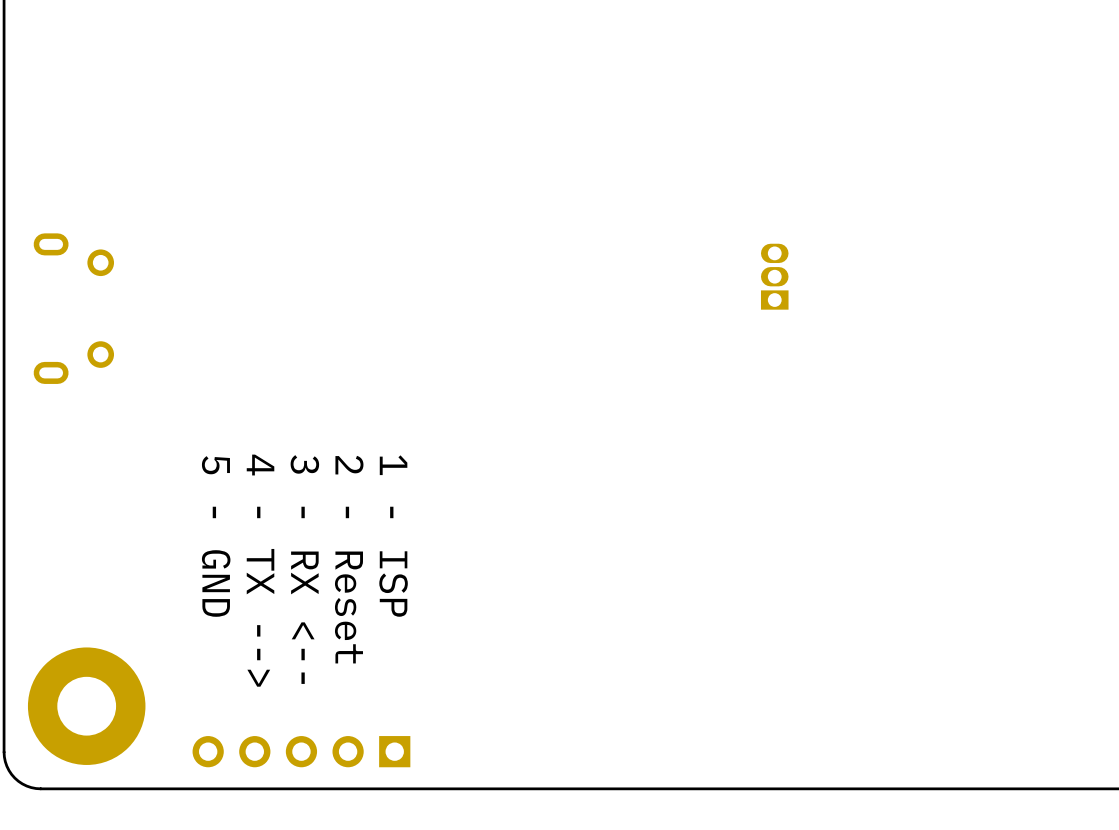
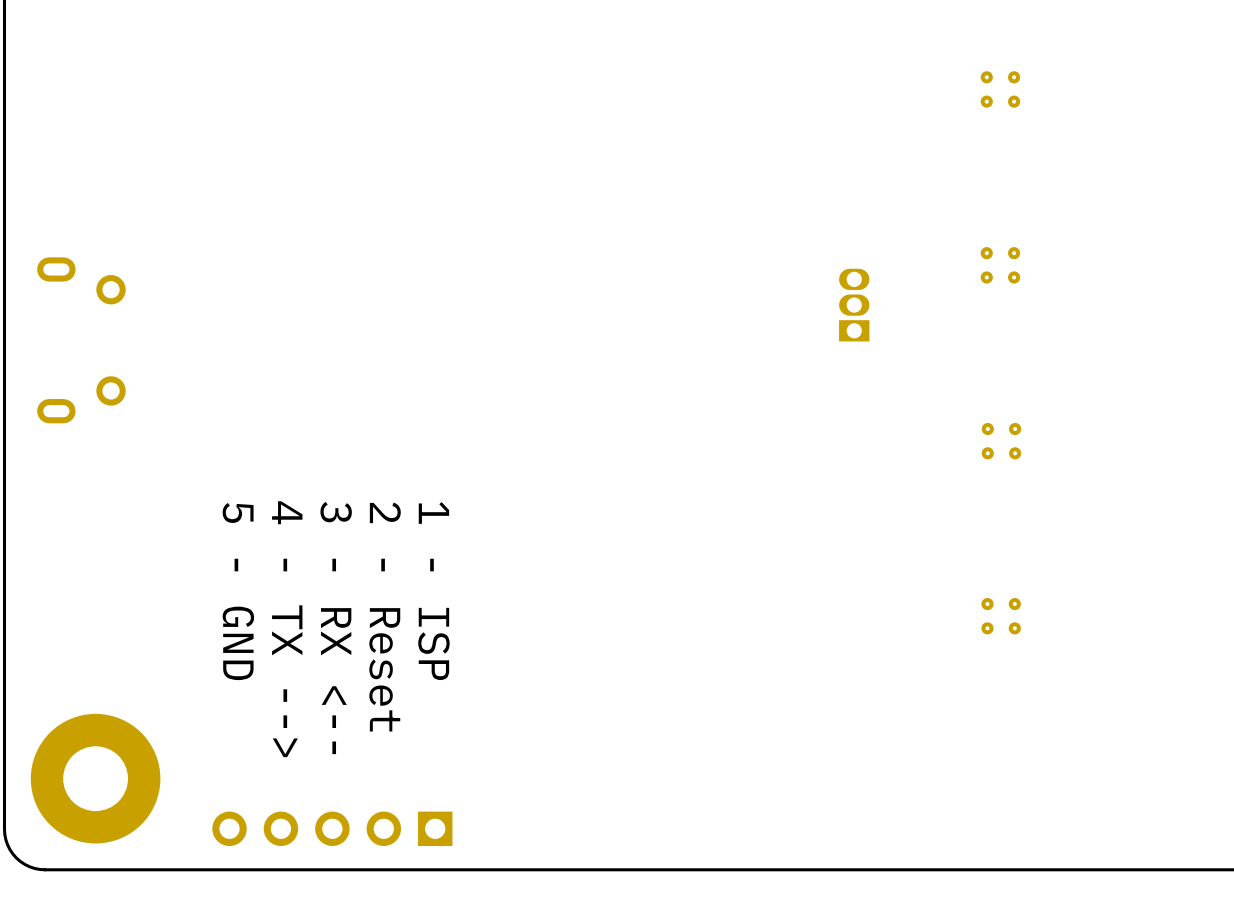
part: none -> (1000, 89)
part: none -> (1000, 265)
part: none -> (1001, 441)
part: none -> (1001, 616)

